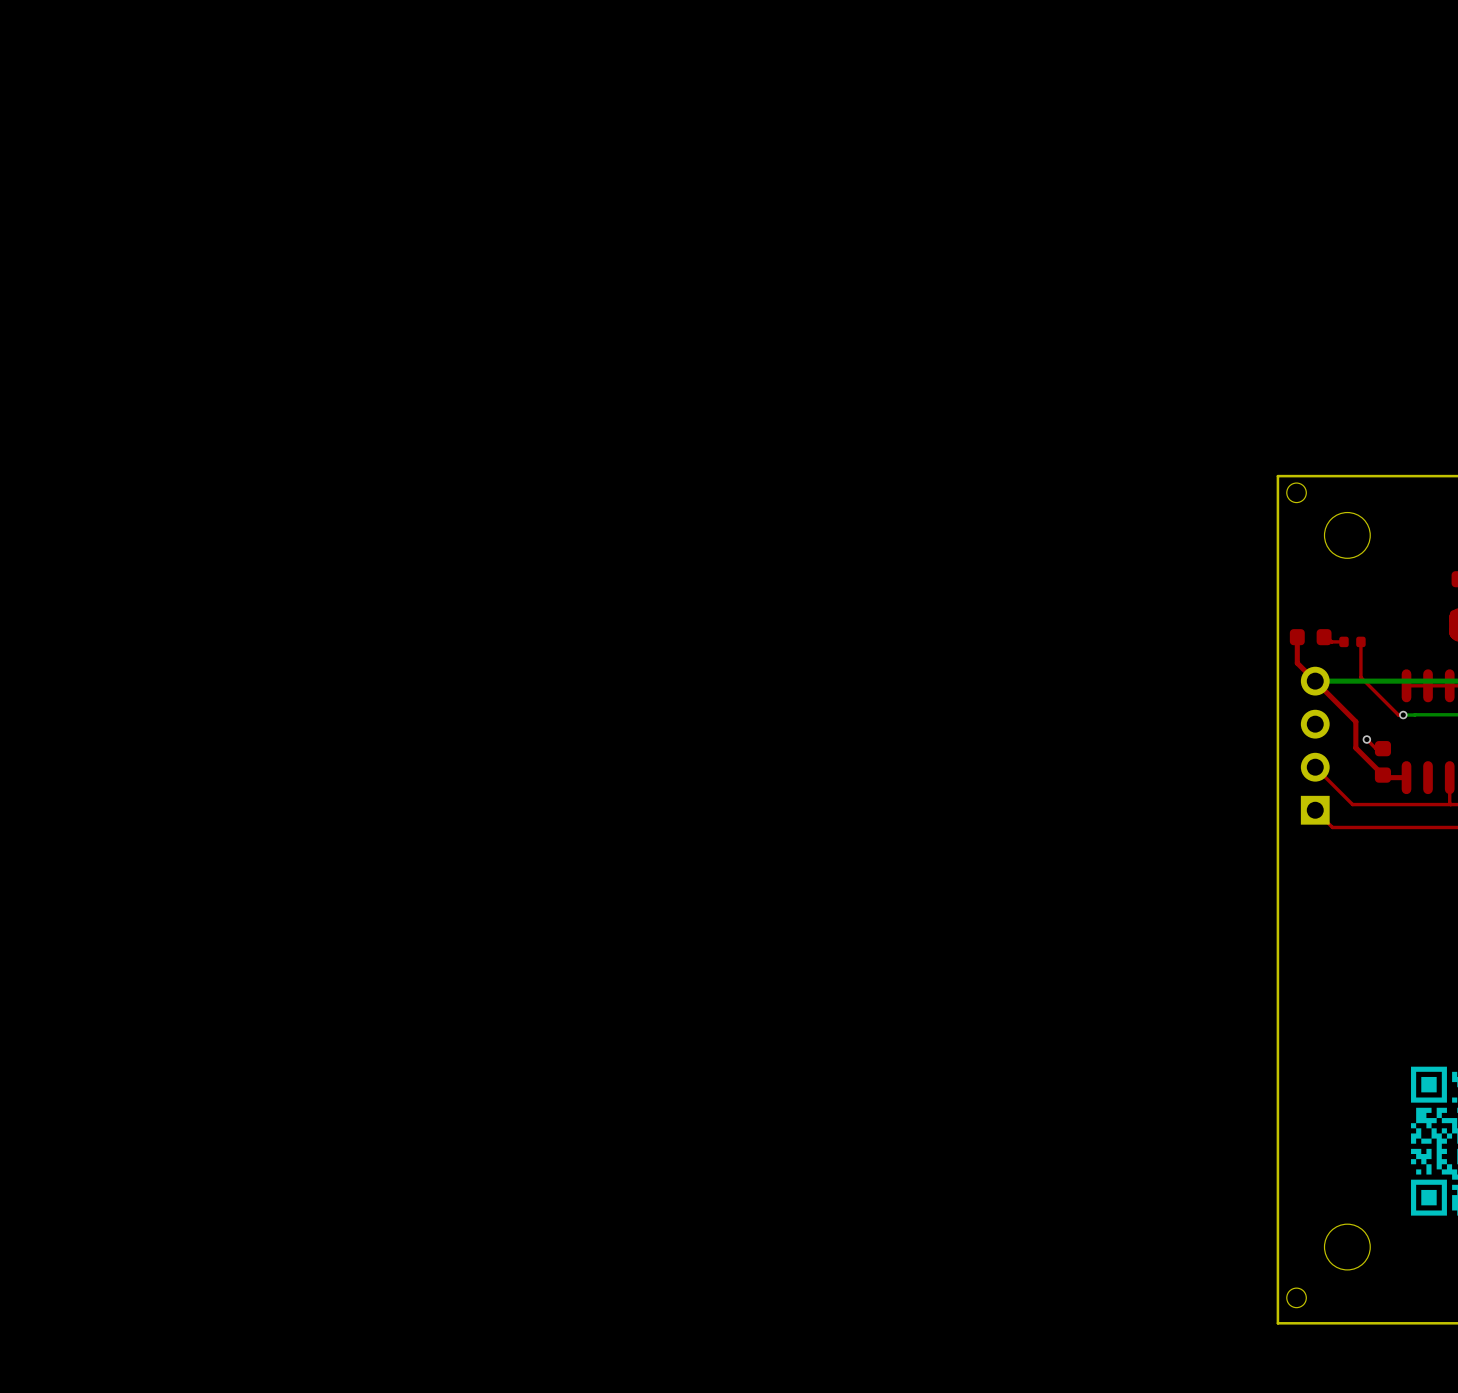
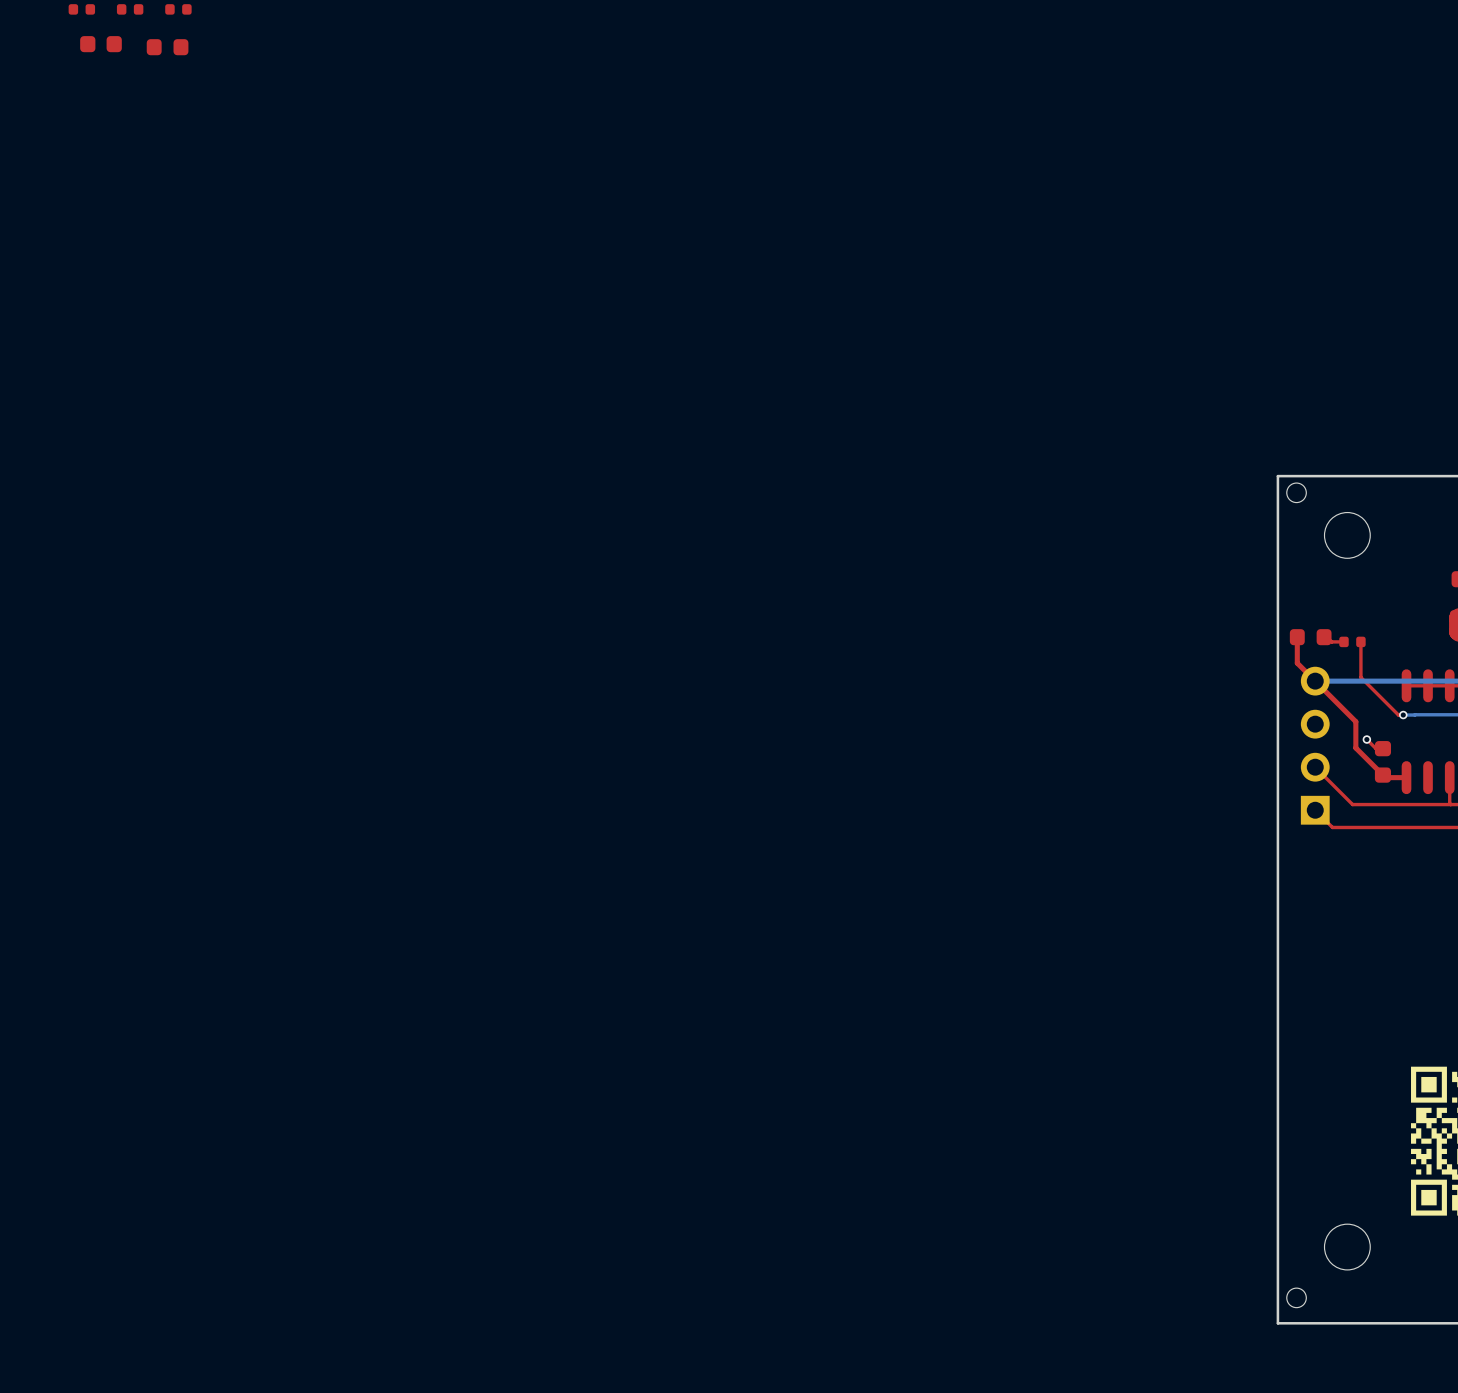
part: none -> (81, 9)
part: none -> (130, 9)
part: none -> (178, 9)
part: none -> (100, 44)
part: none -> (167, 47)

